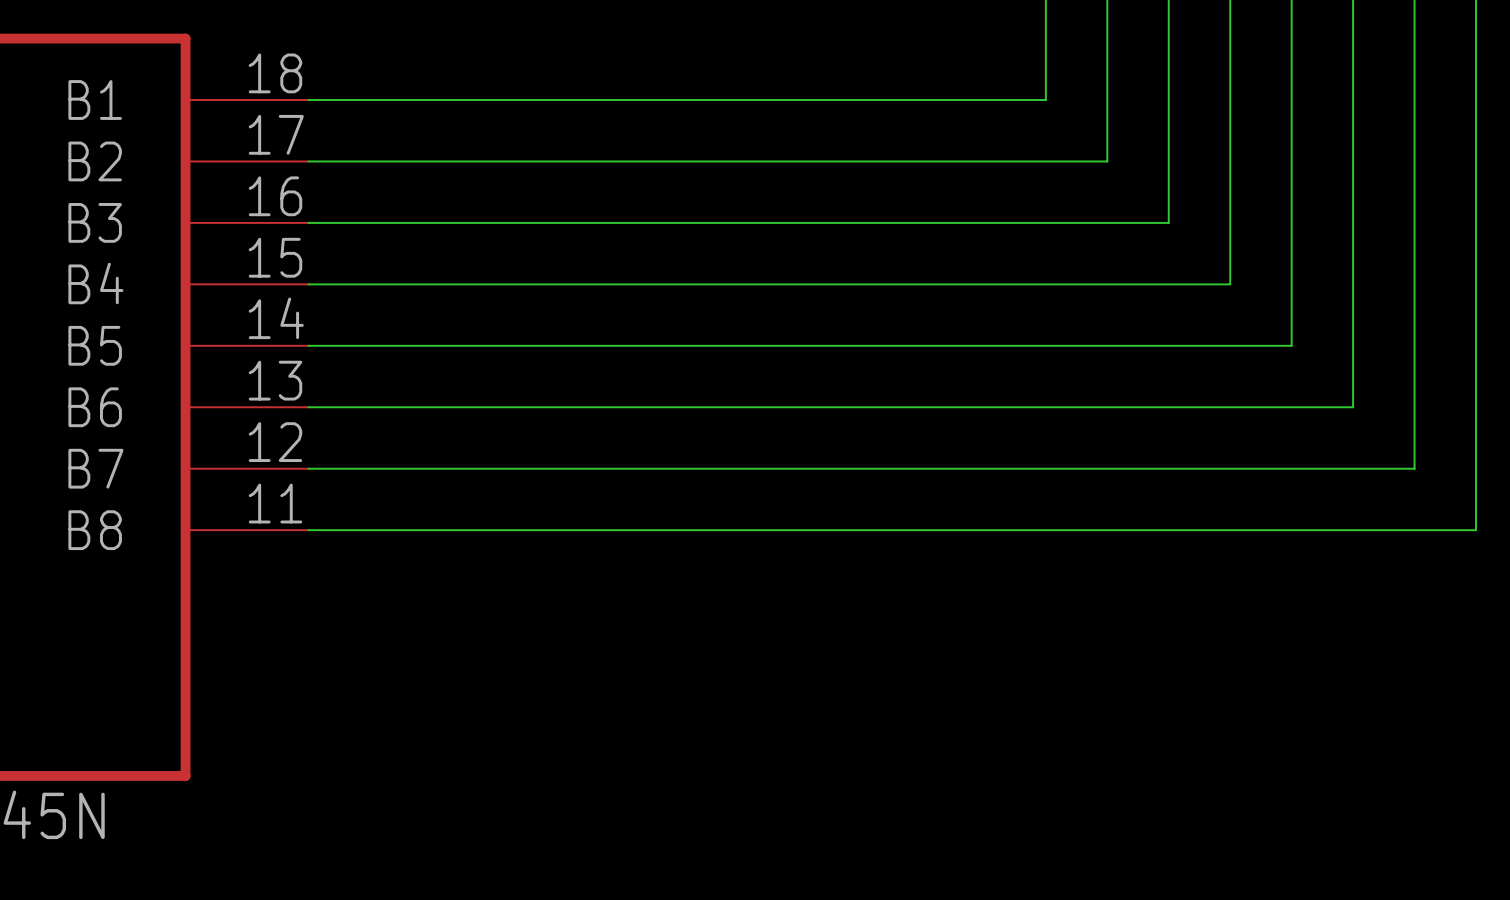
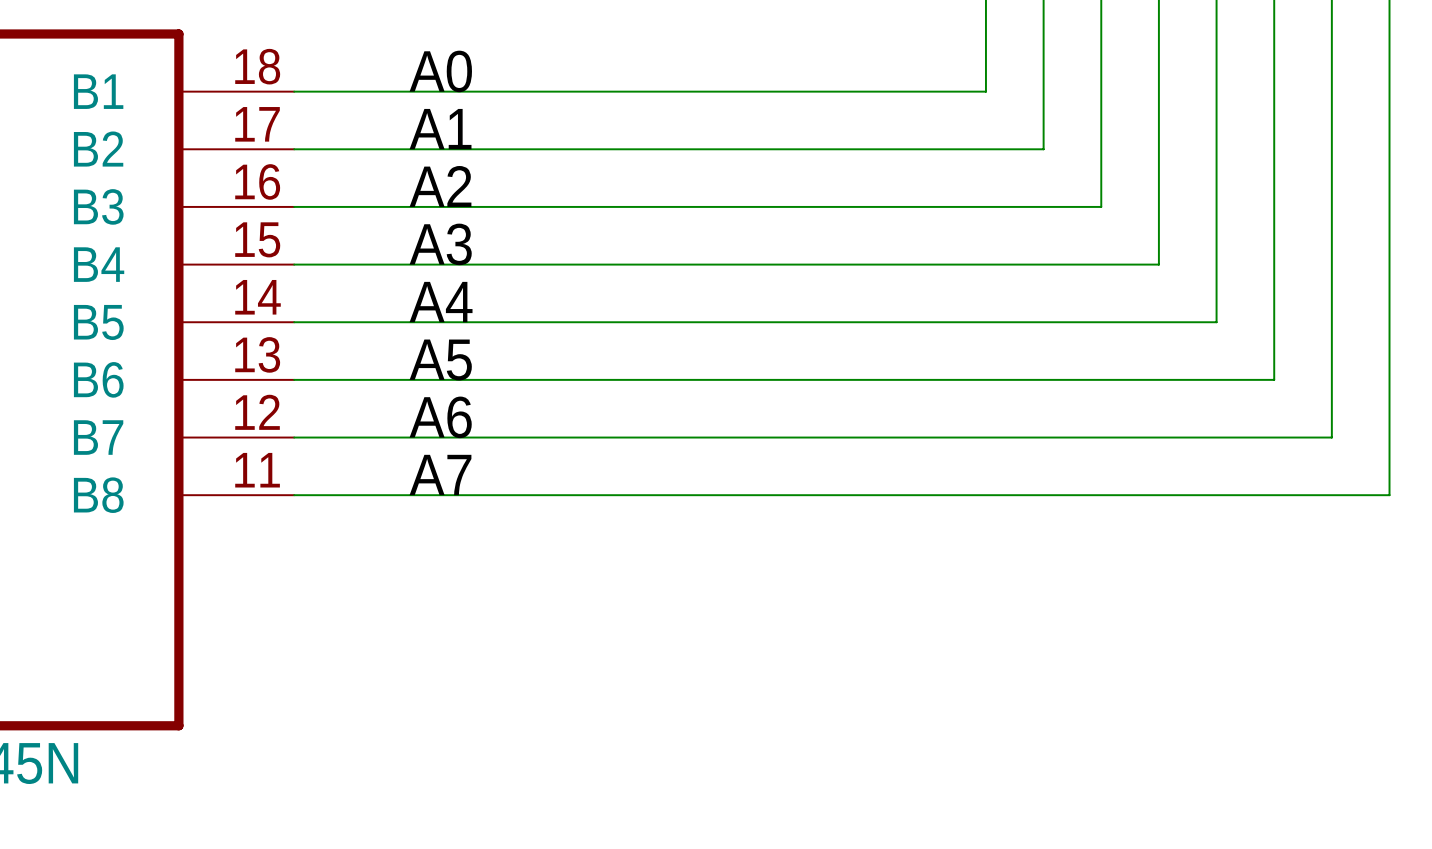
label: none -> A0 (440, 71)
label: none -> A1 (440, 129)
label: none -> A2 (440, 186)
label: none -> A3 (440, 244)
label: none -> A4 (441, 302)
label: none -> A5 (440, 360)
label: none -> A6 (440, 417)
label: none -> A7 (440, 475)

